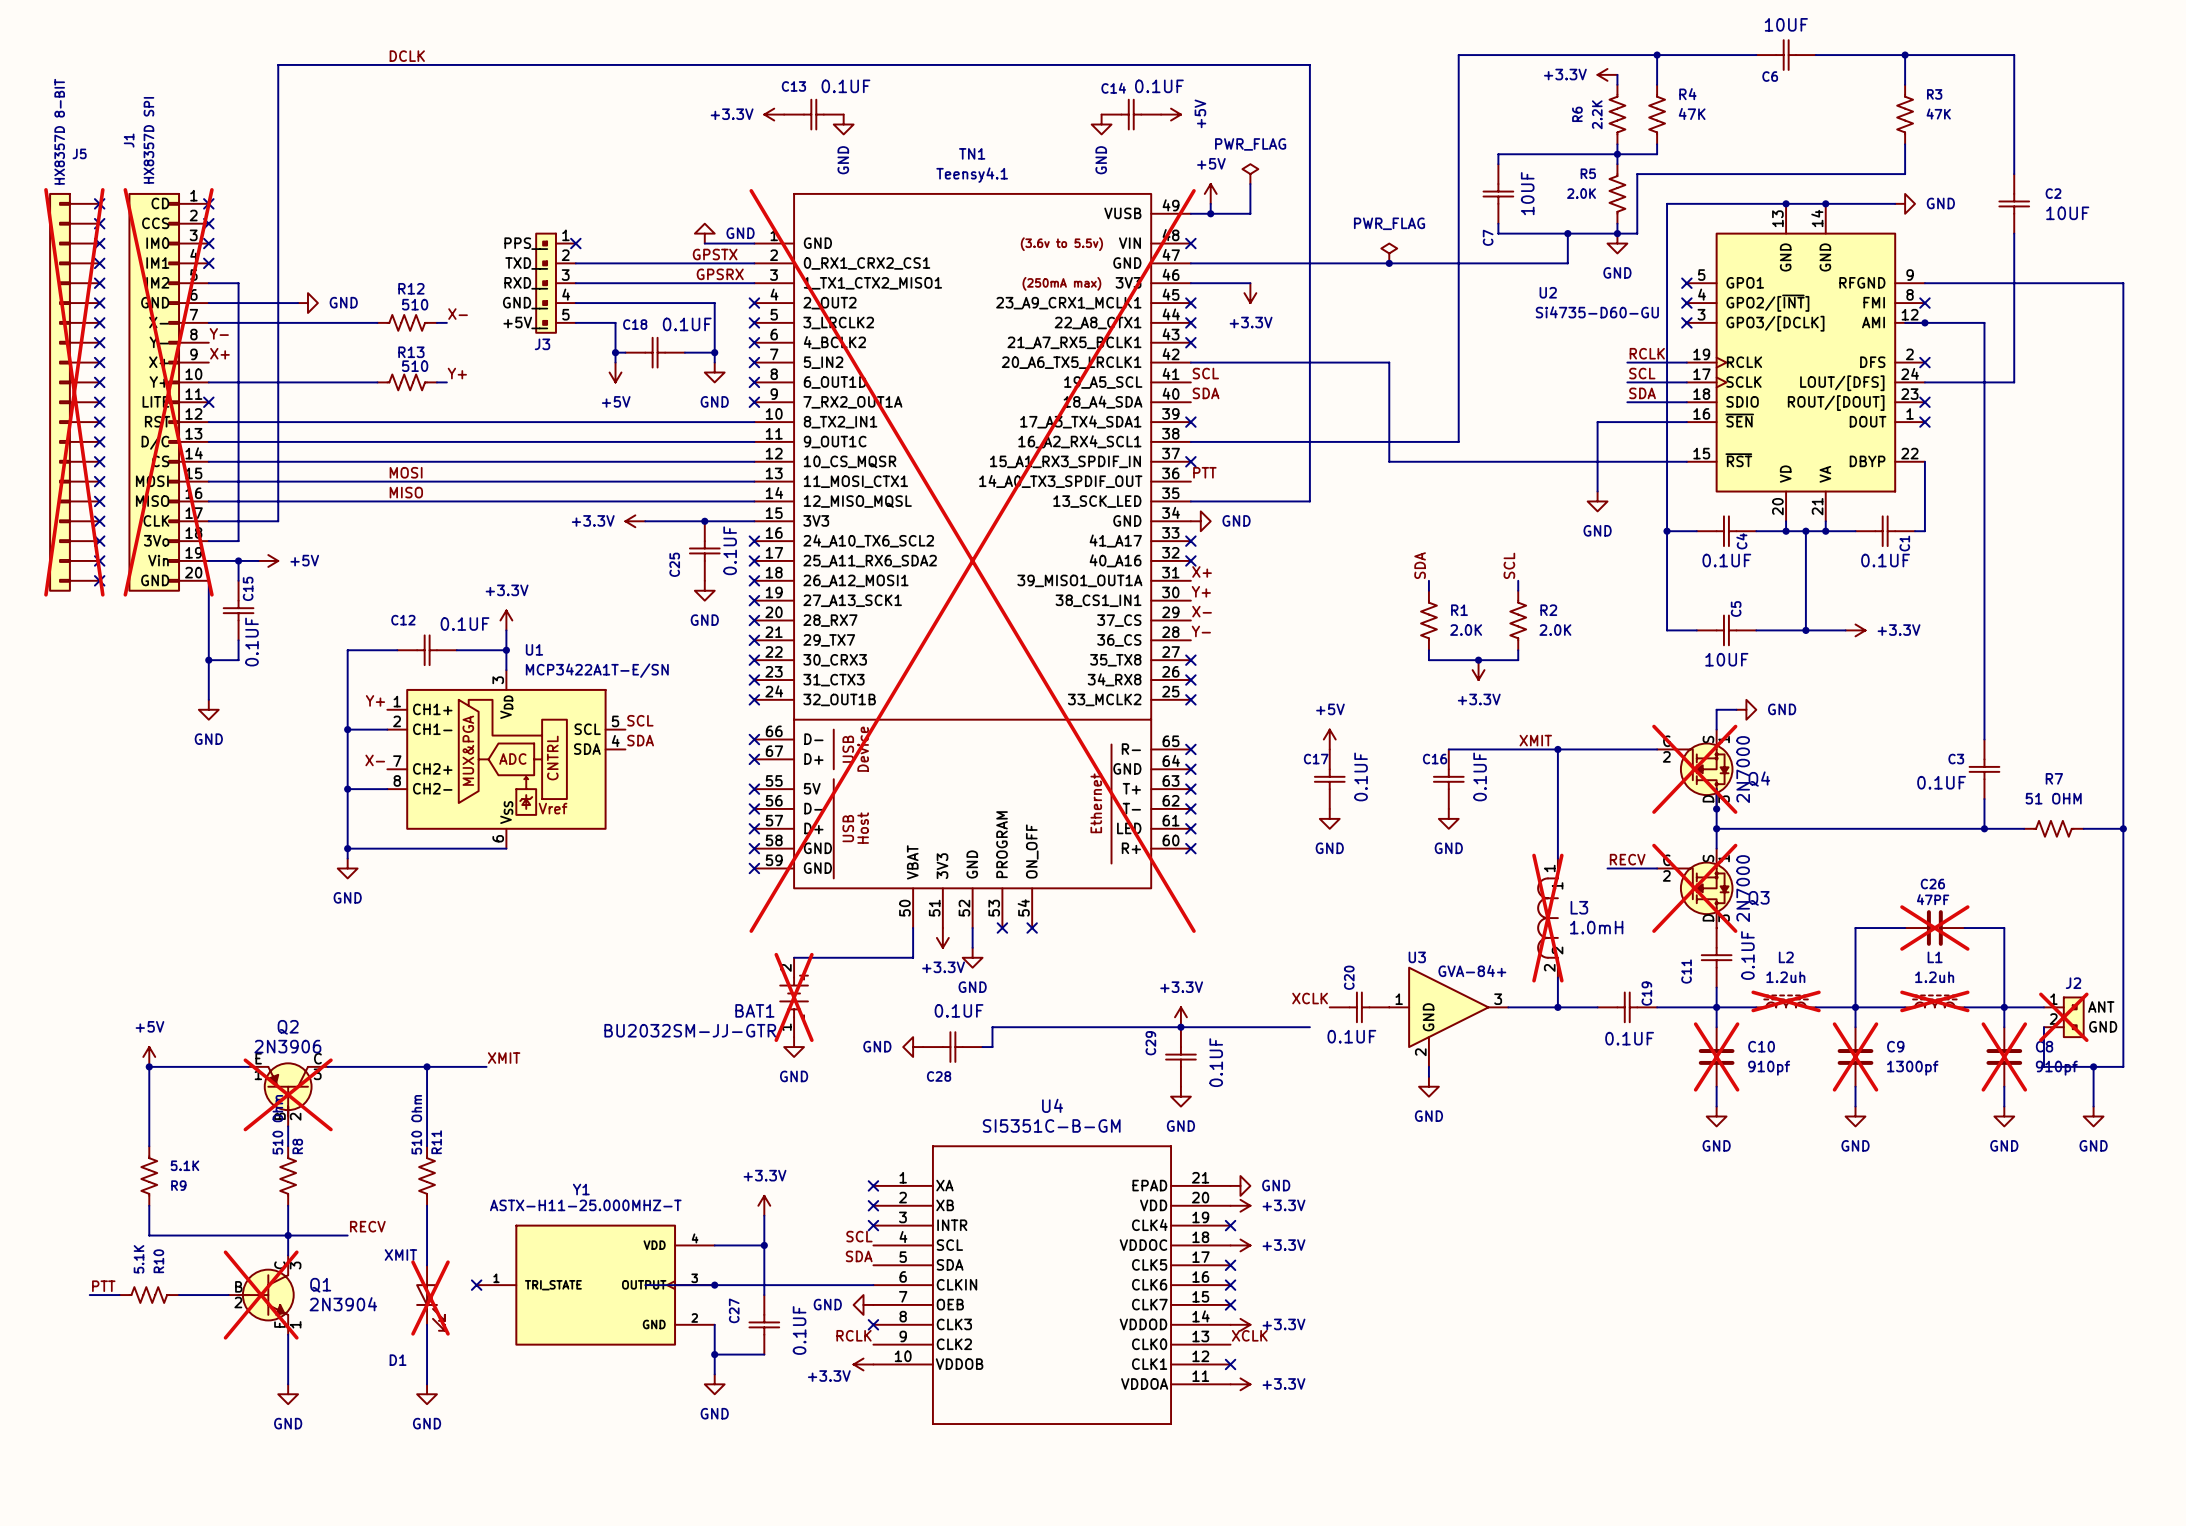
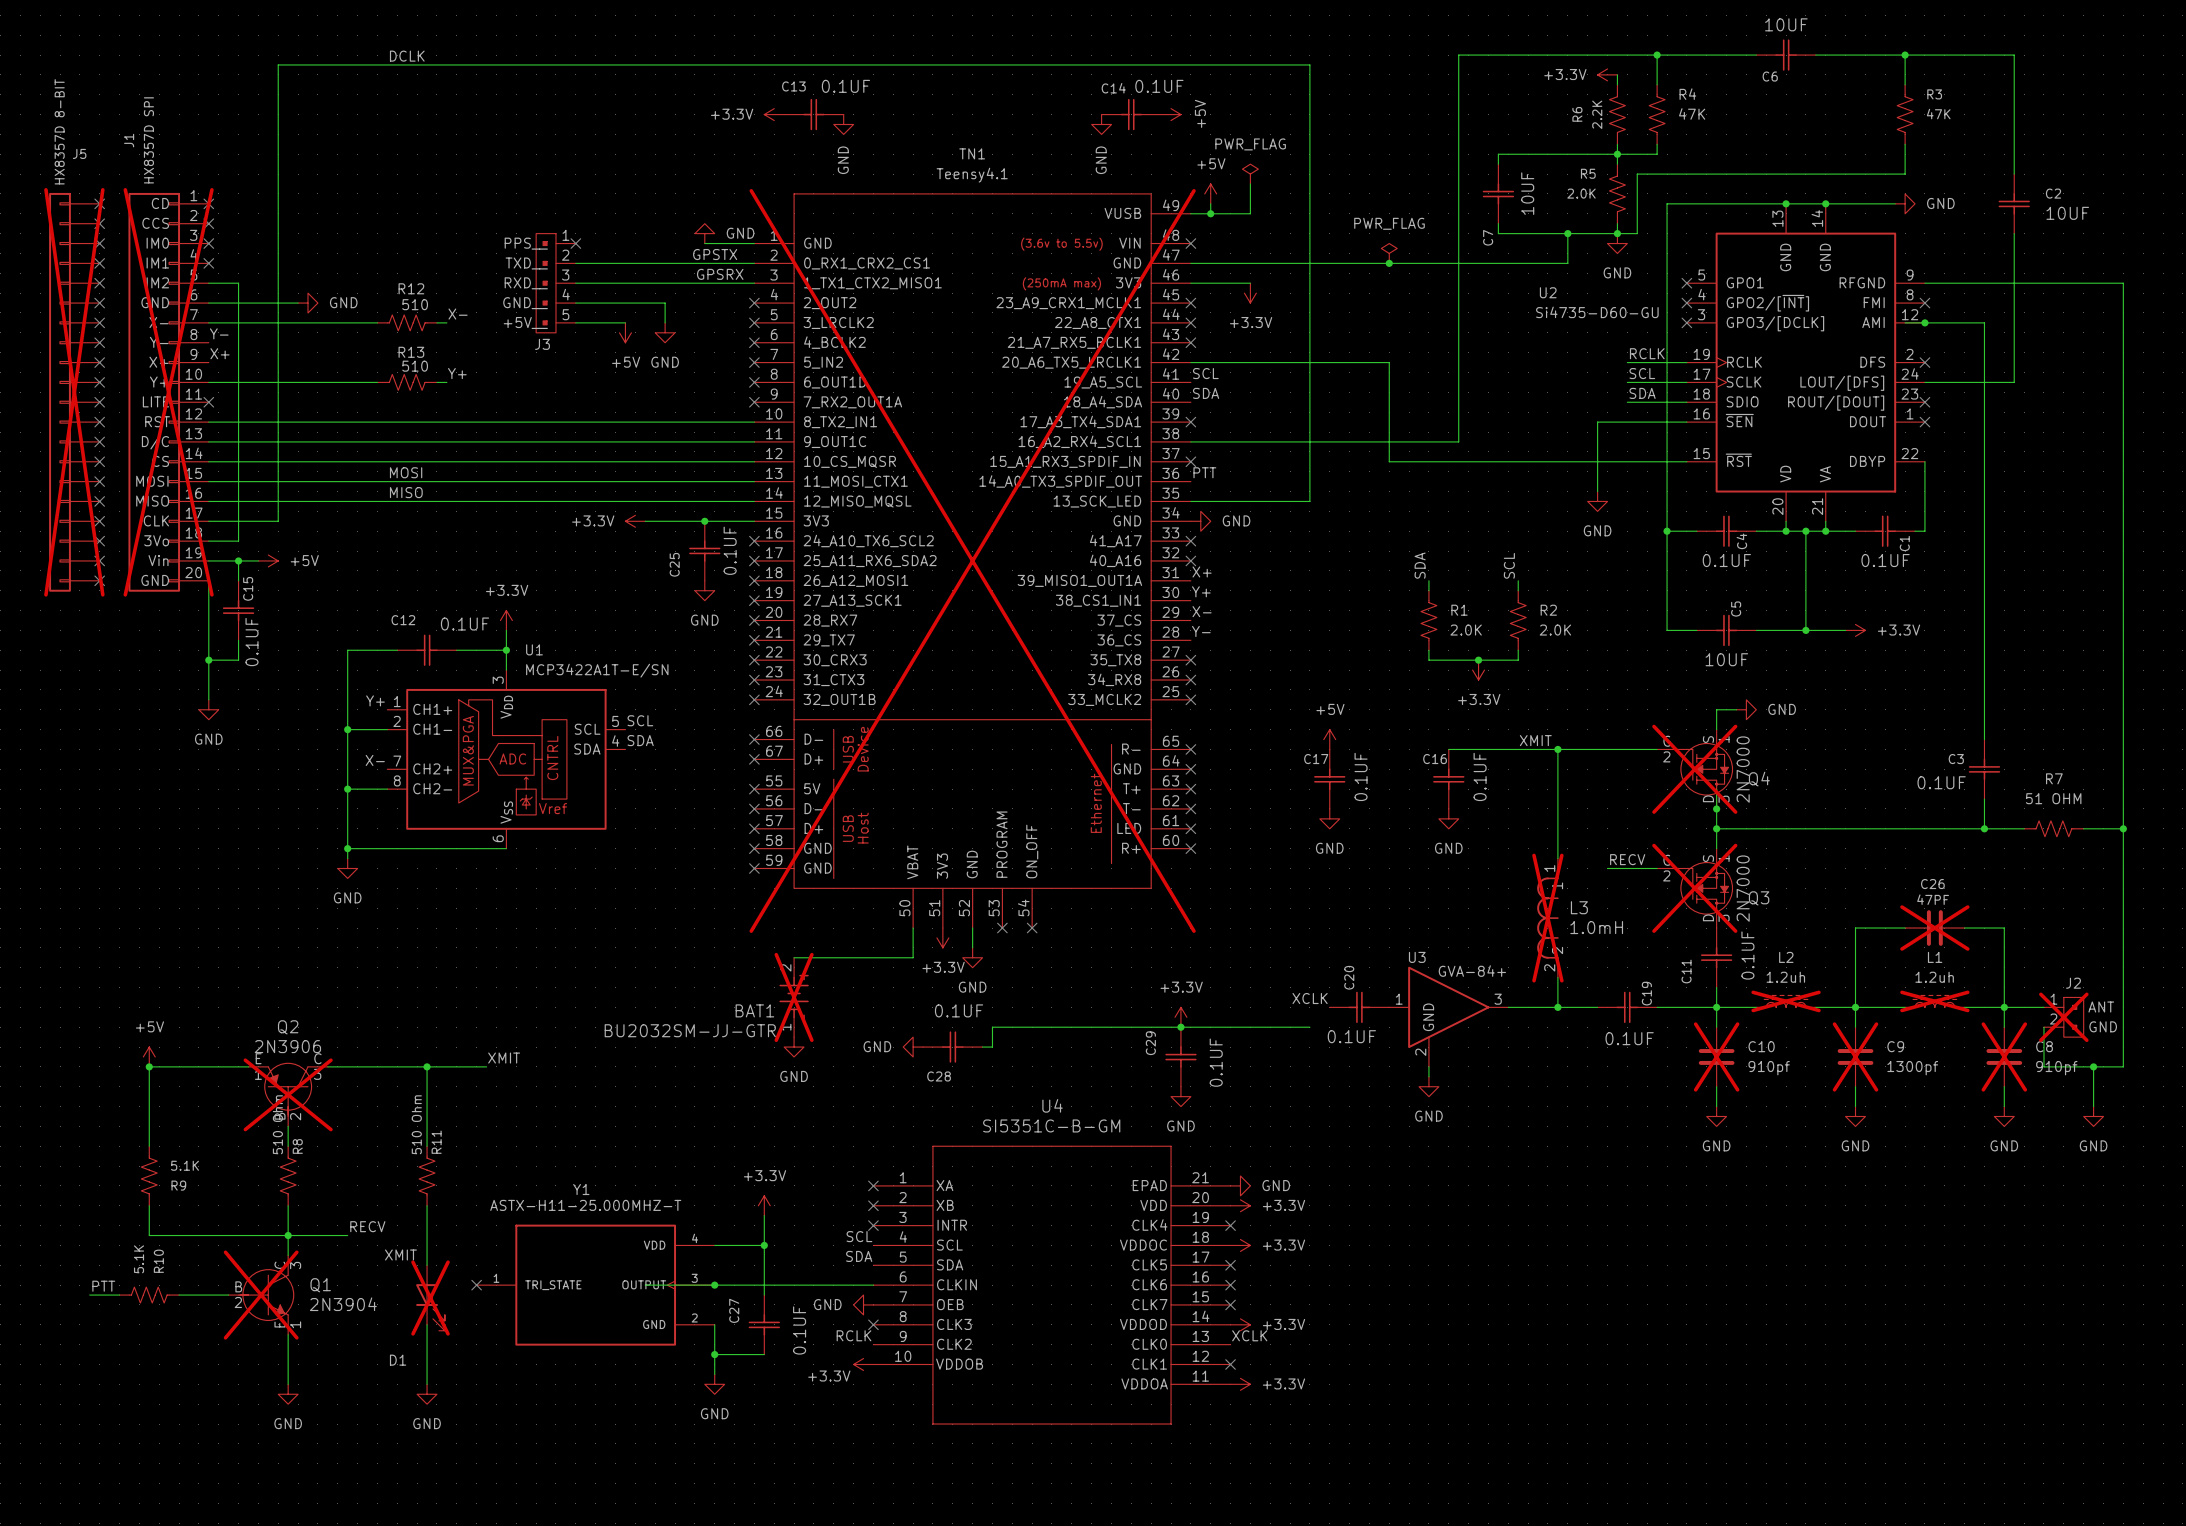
wire: (665, 303) (714, 303) (714, 362) -> (665, 303) (665, 322)
wire: (615, 322) (615, 362) -> (615, 322) (625, 322)
wire: (615, 352) (625, 352) -> none
junction: (615, 352) -> none
C18: 0.1UF (655, 352) -> none
wire: (684, 352) (714, 352) -> none
junction: (714, 352) -> none
power symbol position: +5V (615, 372) -> +5V (625, 332)
power symbol position: GND (714, 372) -> GND (665, 332)

